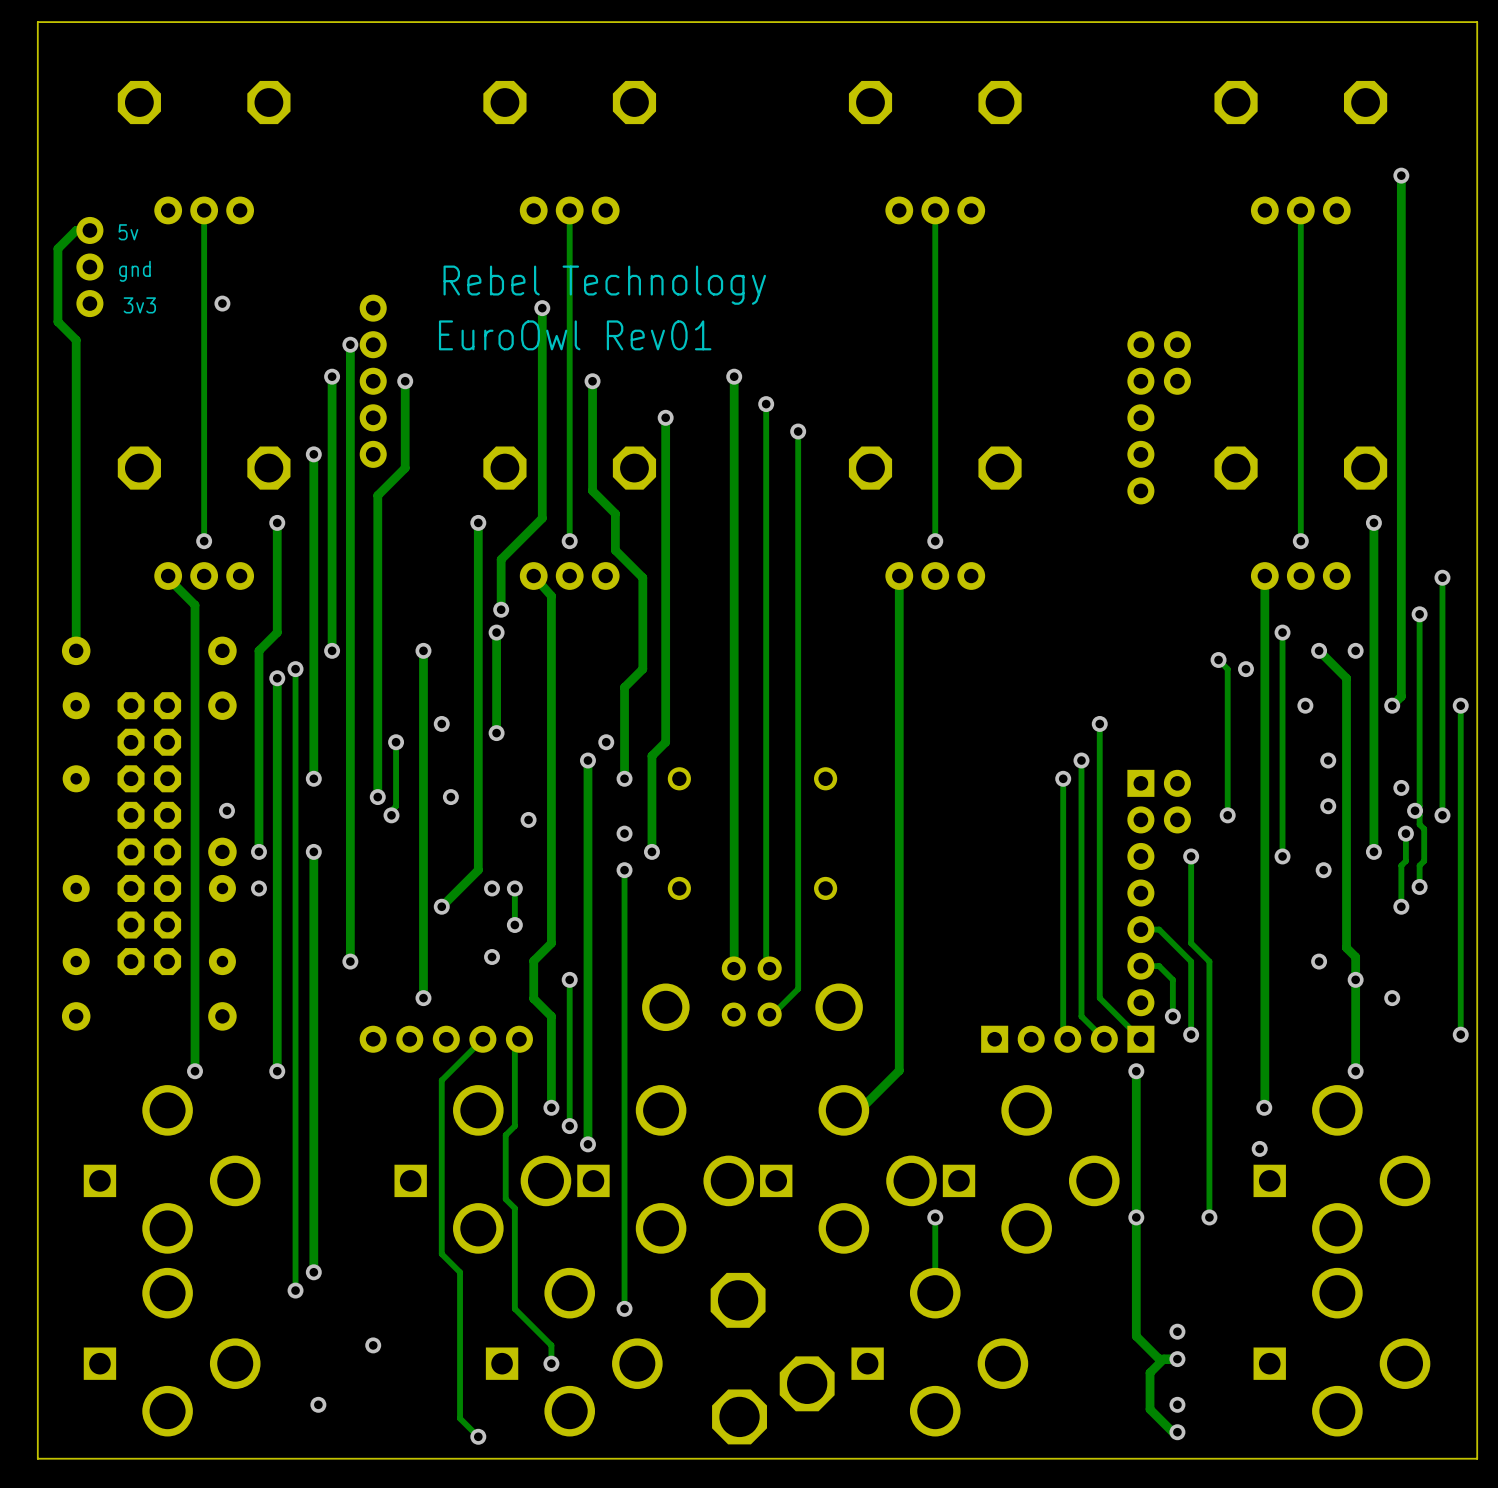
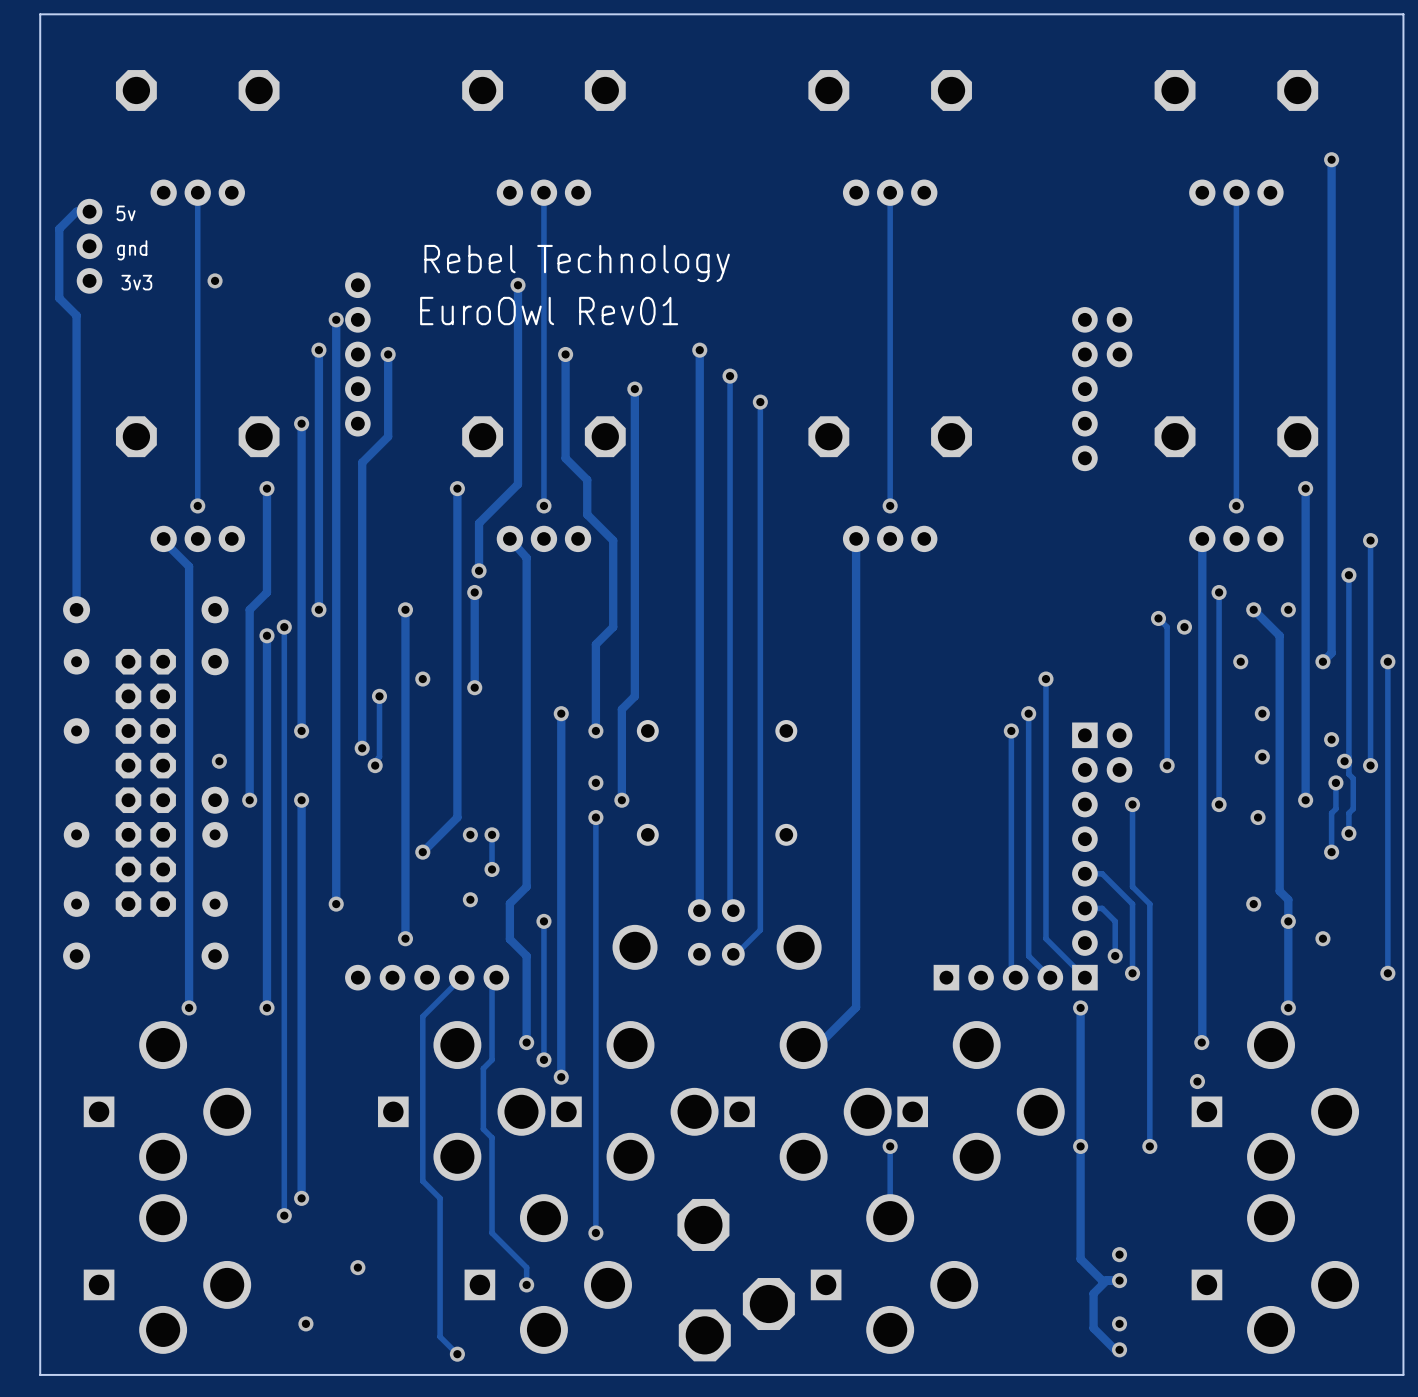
via: (606, 742) -> none
via: (450, 797) -> none
via: (528, 819) -> none
via: (258, 888) -> none

